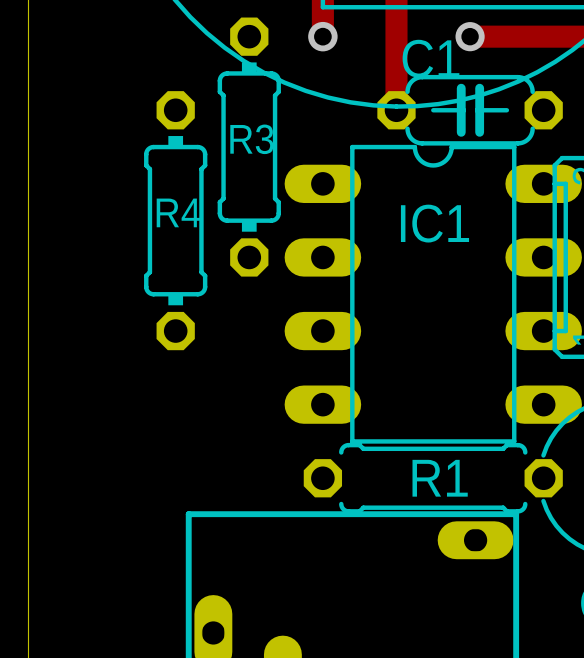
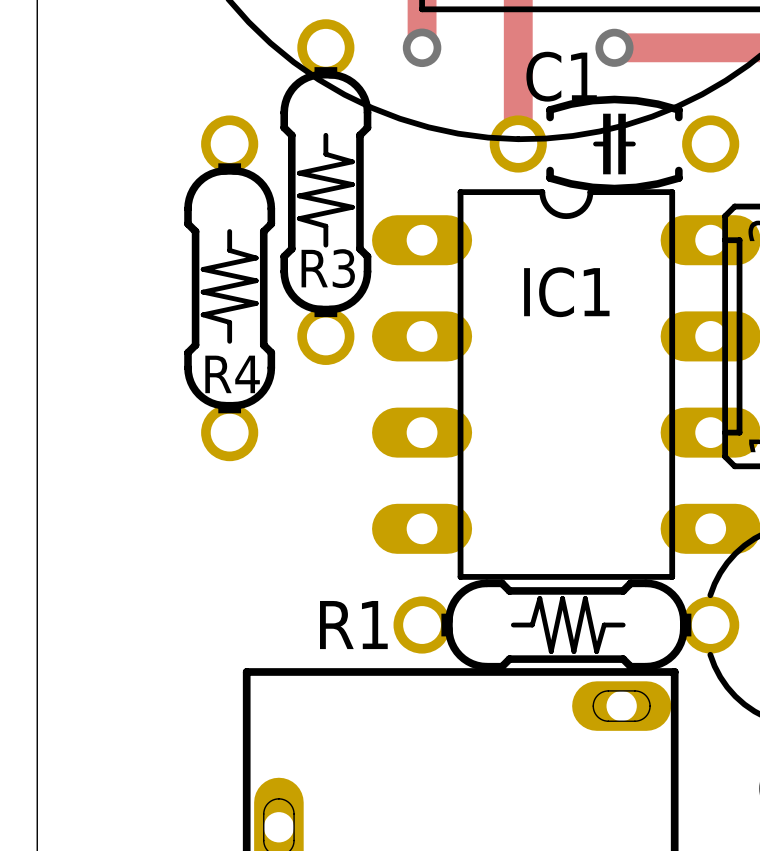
R3 footprint: [217, 17, 281, 277] -> [280, 19, 372, 365]
C1 footprint: [377, 74, 563, 146] -> [489, 95, 740, 193]
R4 footprint: [144, 91, 208, 351] -> [184, 115, 276, 462]
R3 name position: R3 (251, 139) -> R3 (328, 268)
R4 name position: R4 (178, 212) -> R4 (232, 374)
R1 footprint: [303, 442, 563, 514] -> [393, 579, 740, 671]
R1 name position: R1 (440, 478) -> R1 (353, 625)

